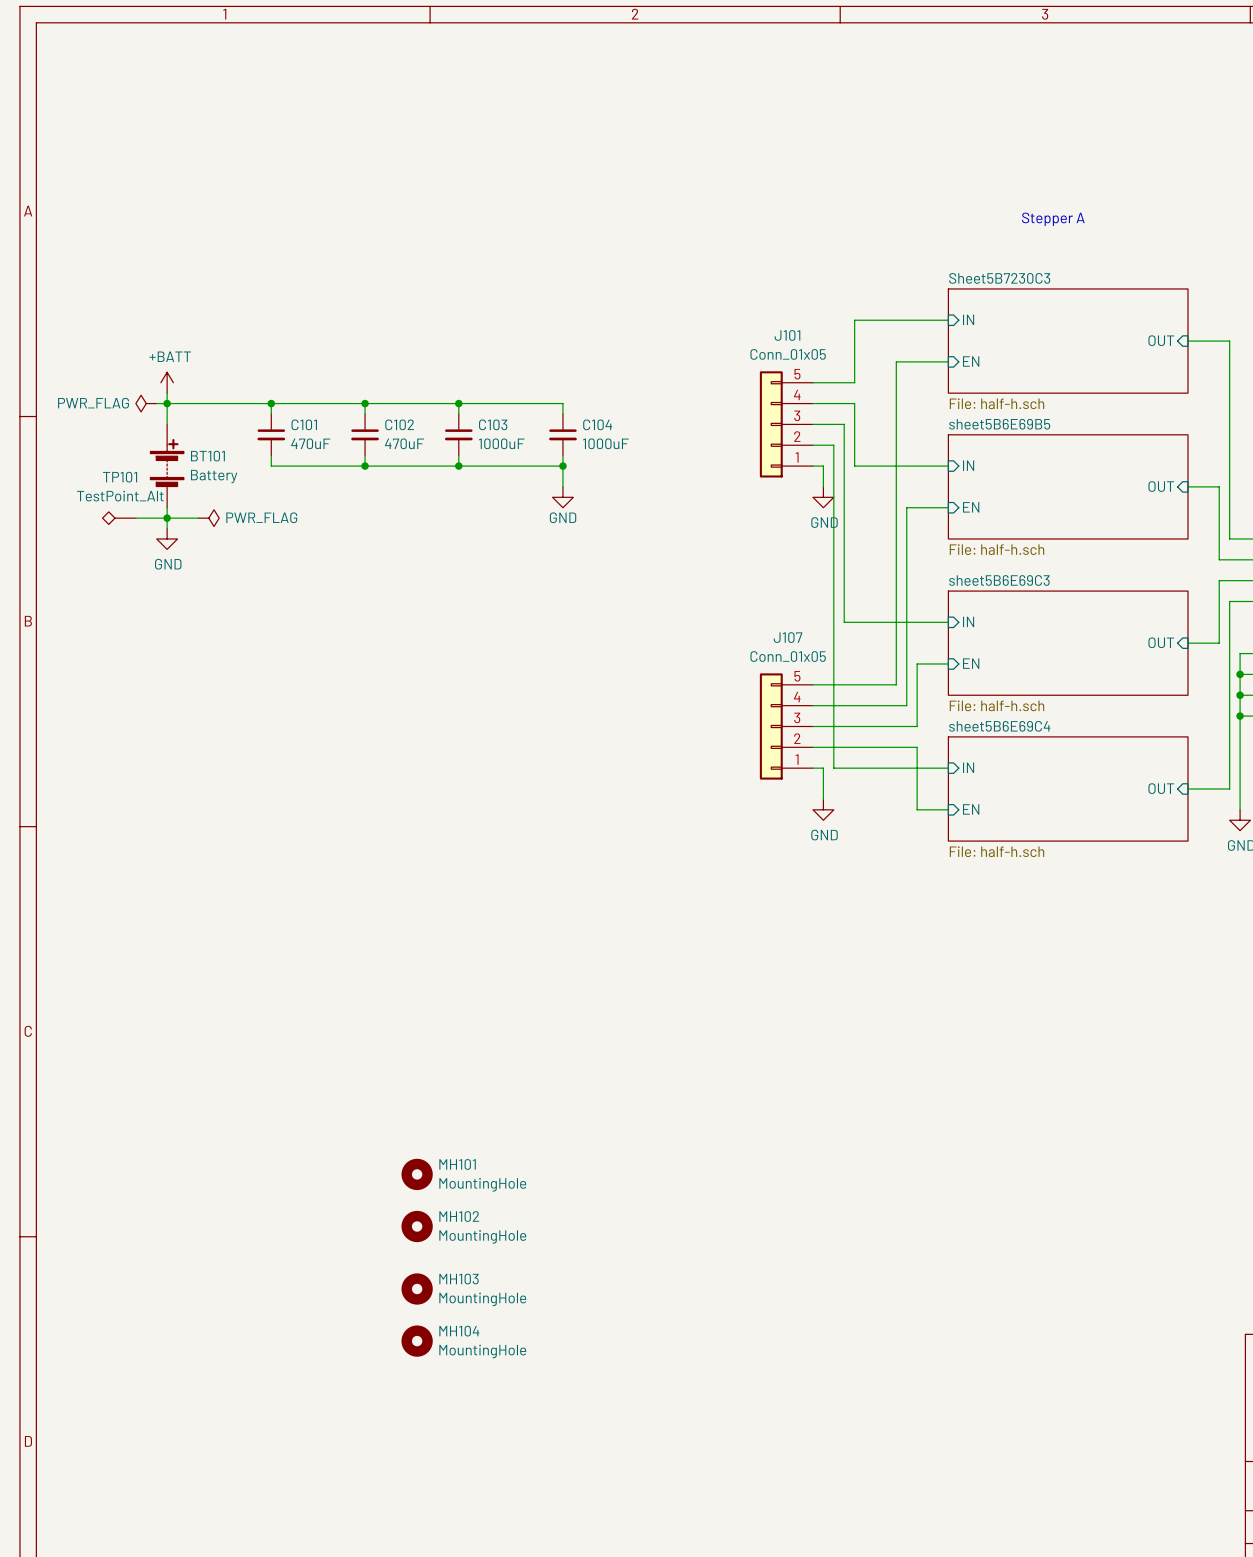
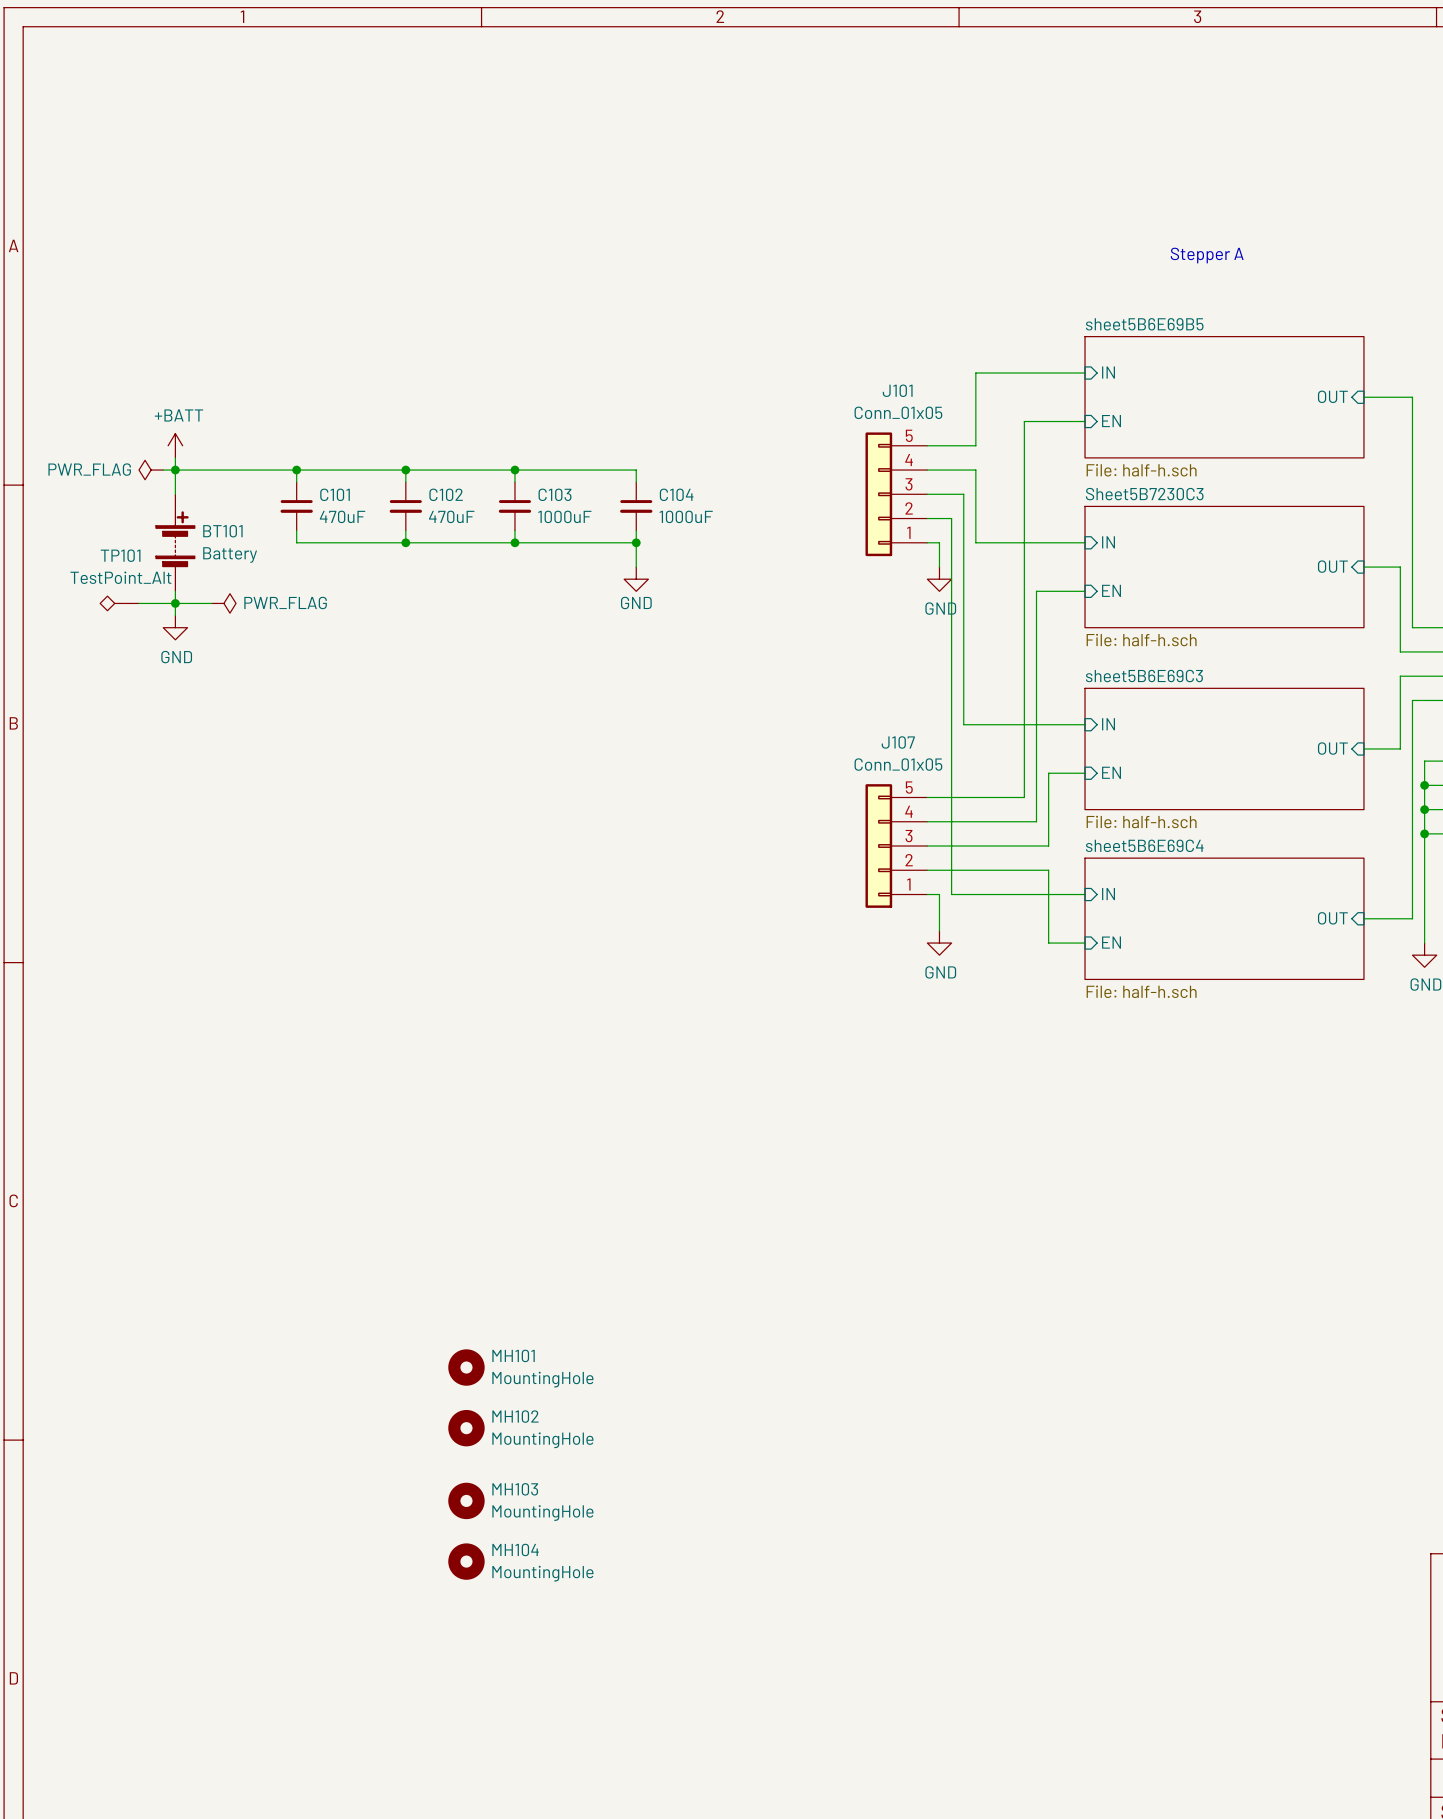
sheet Sheet5B7230C3 name: Sheet5B7230C3 (999, 278) -> sheet5B6E69B5 (1144, 324)
sheet sheet5B6E69B5 name: sheet5B6E69B5 (999, 424) -> Sheet5B7230C3 (1144, 494)

